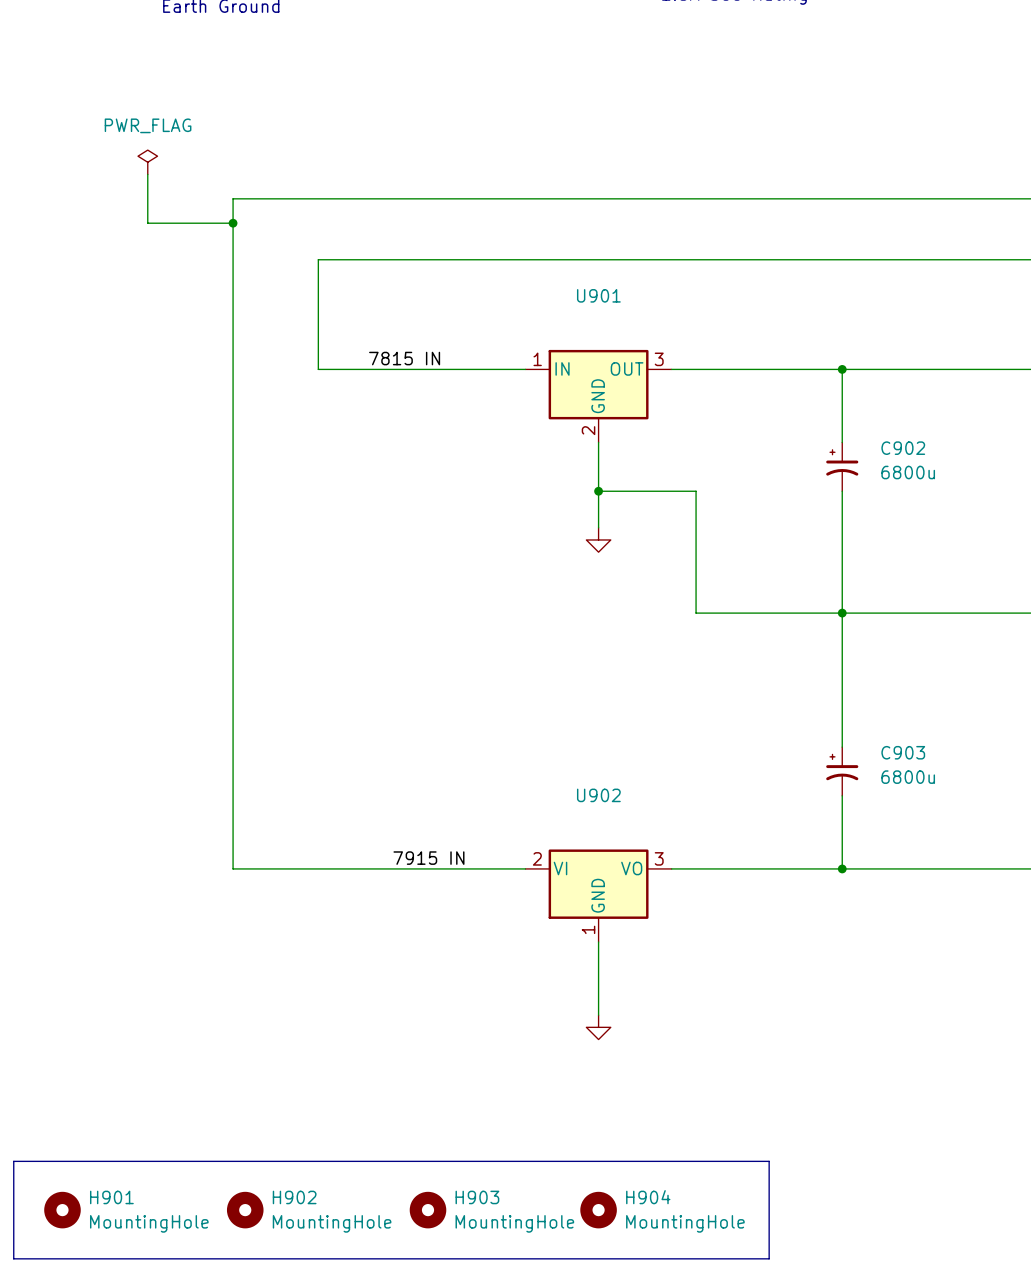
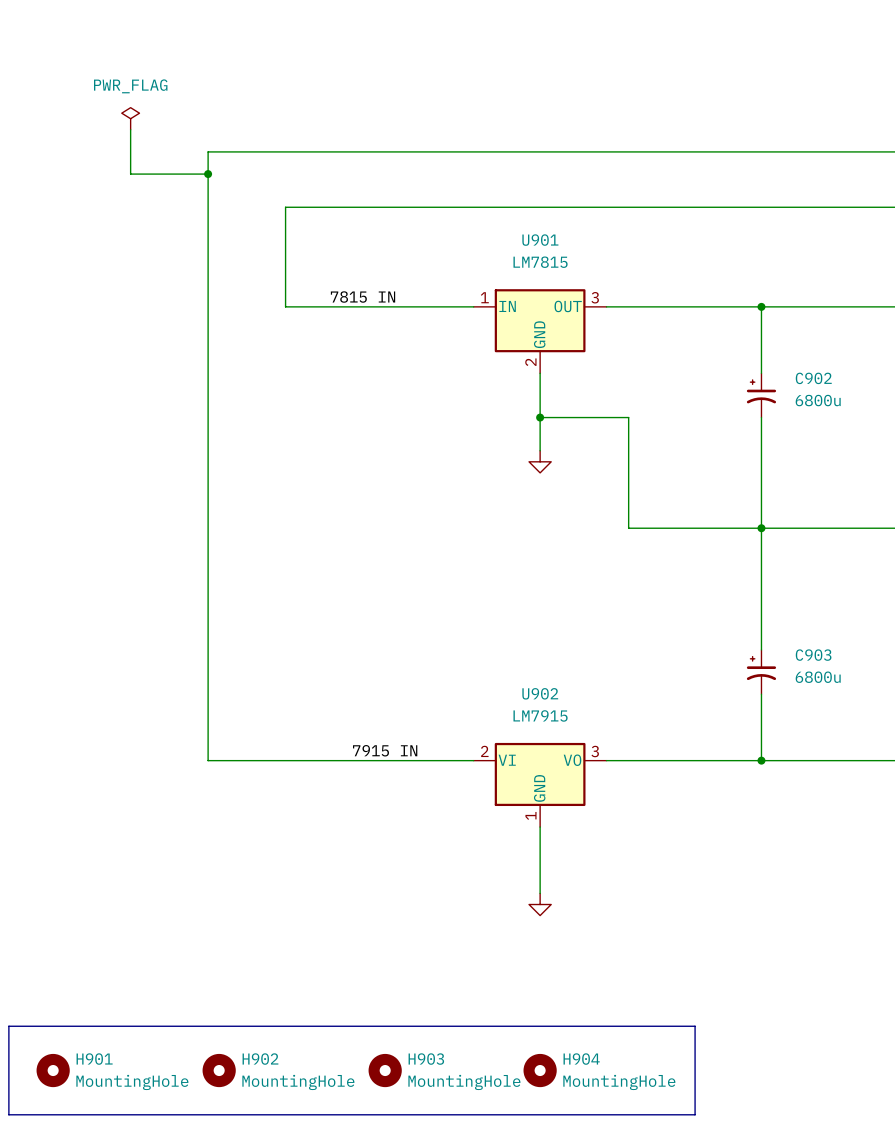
U901 value: none -> LM7815 (540, 262)
U902 value: none -> LM7915 (540, 715)

